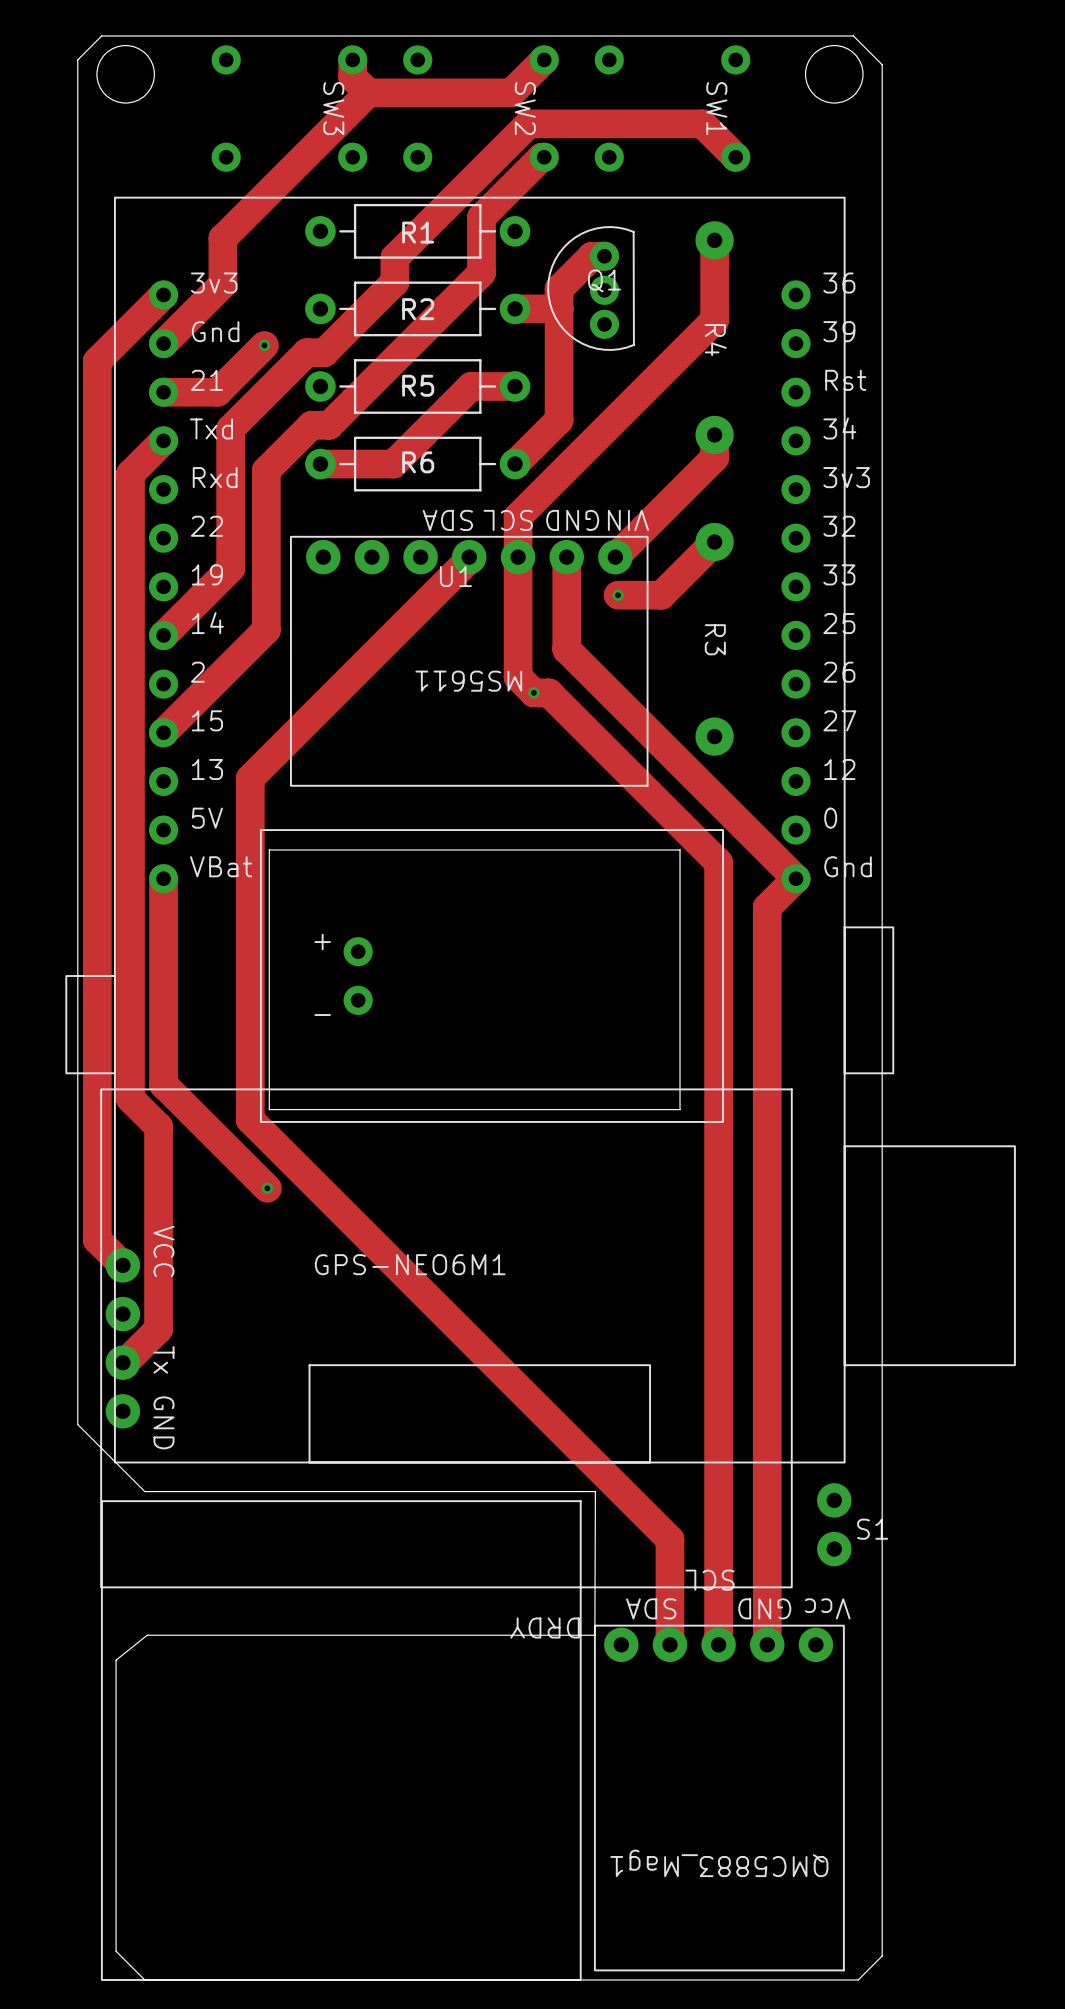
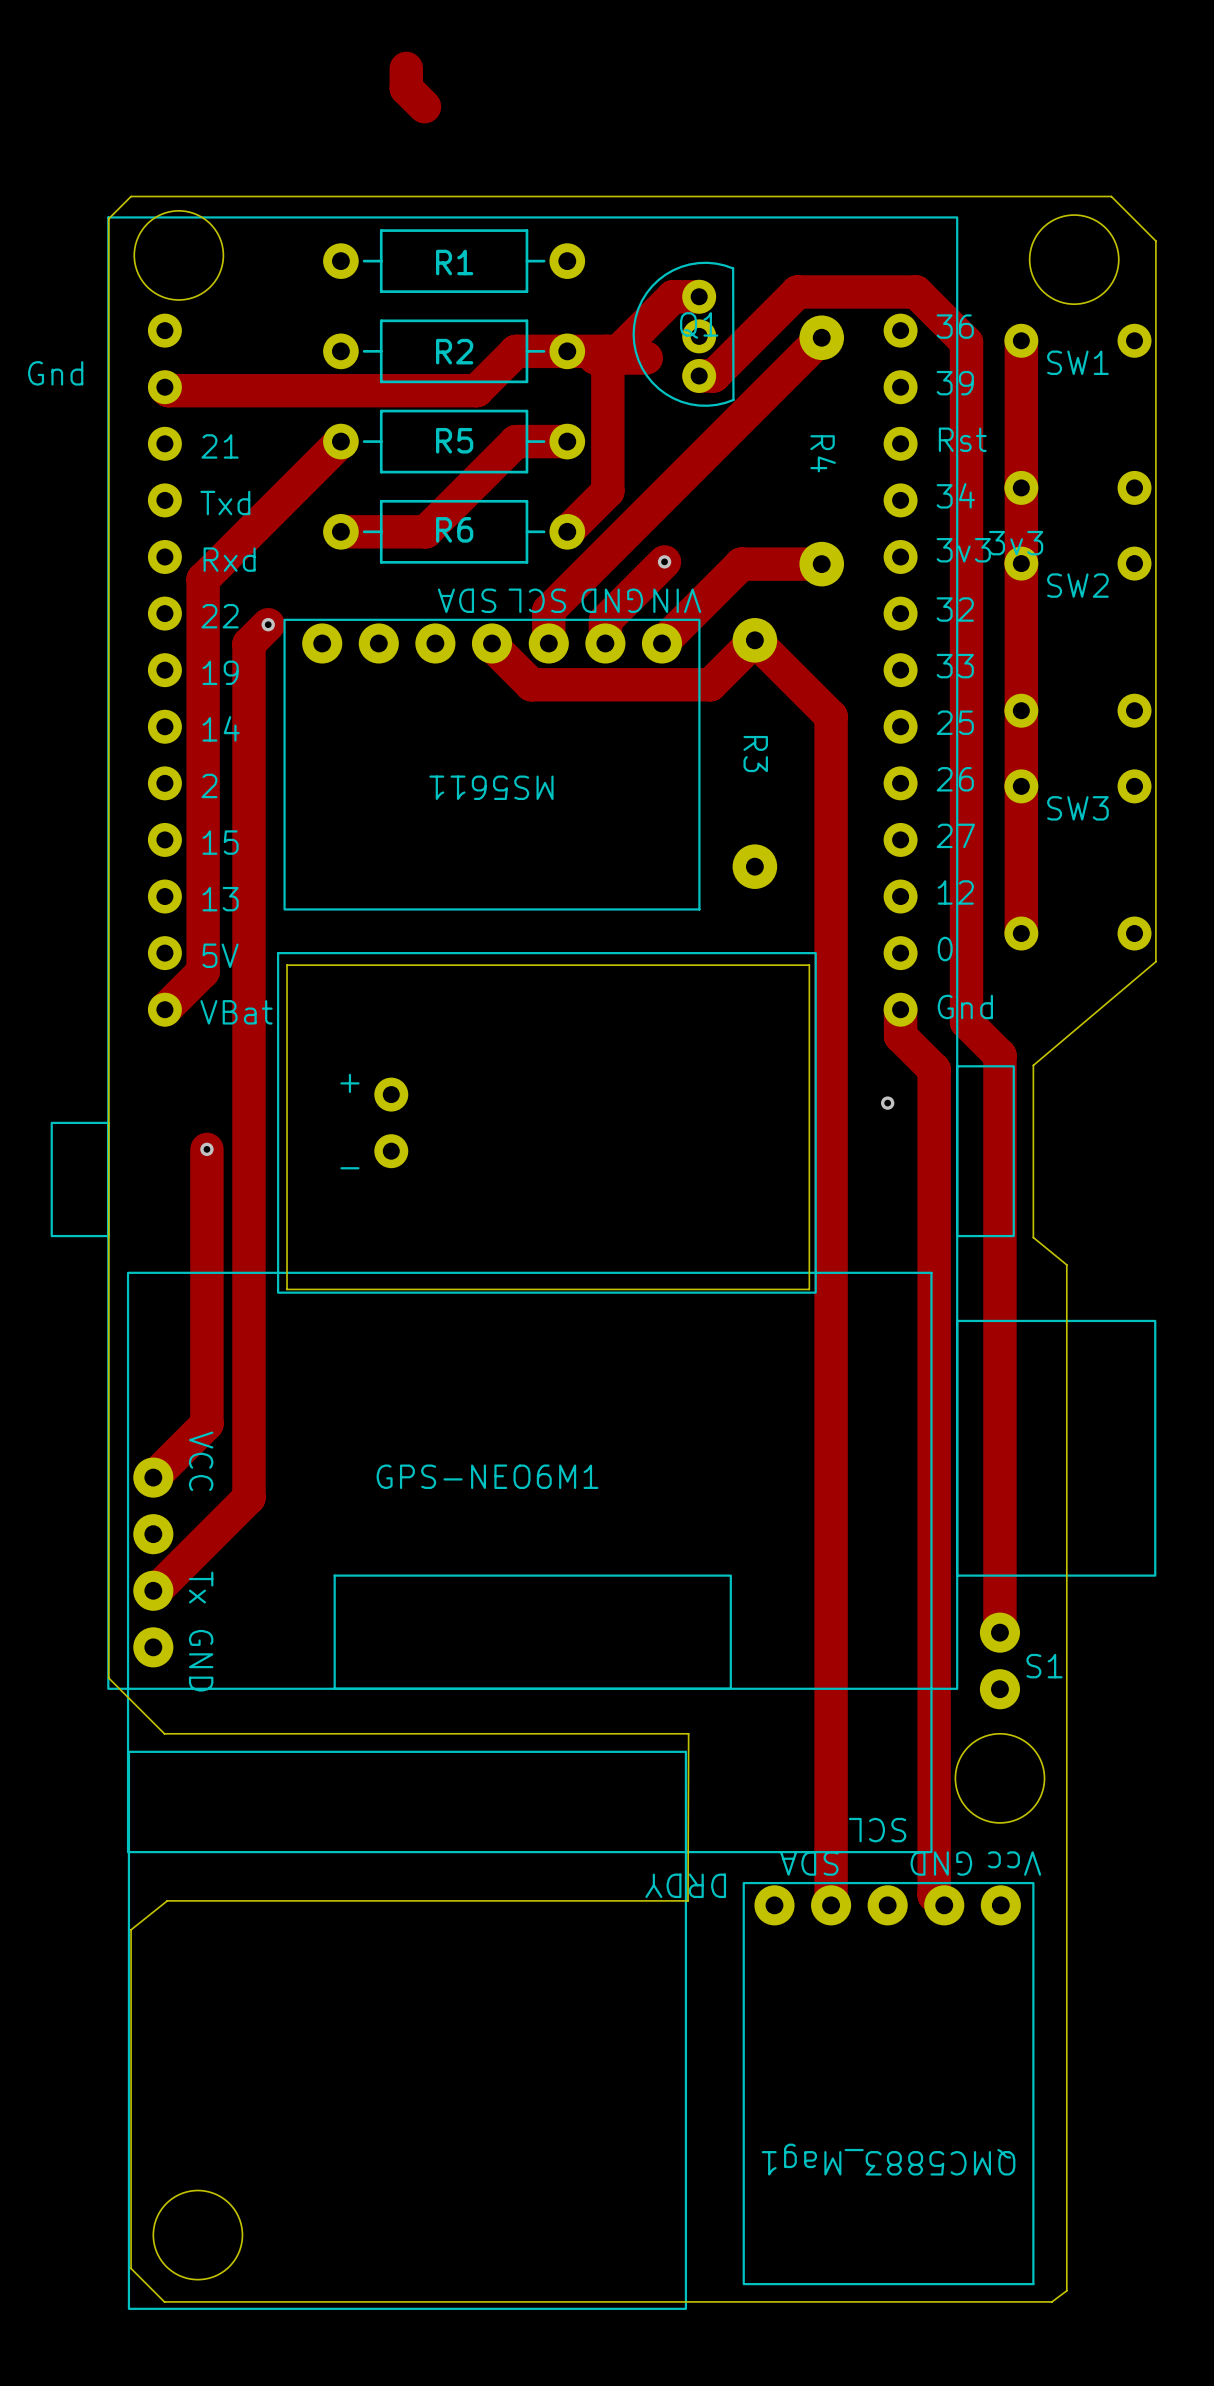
round board edge: [96, 45, 155, 104] -> none
round board edge: [805, 45, 864, 104] -> none
track: (544, 59) (511, 92) (368, 92) (222, 238) (222, 284) (163, 343) -> none
SW3 rotation: 0° (289, 108) -> 90° clockwise (1077, 859)
SW3 position: (289, 108) -> (1077, 859)
SW3 name position: SW3 (333, 108) -> SW3 (1077, 808)
SW2 rotation: 0° (480, 108) -> 90° clockwise (1077, 637)
SW2 position: (480, 108) -> (1077, 637)
SW2 name position: SW2 (525, 108) -> SW2 (1077, 585)
SW1 rotation: 0° (672, 108) -> 90° clockwise (1077, 414)
SW1 position: (672, 108) -> (1077, 414)
SW1 name position: SW1 (716, 108) -> SW1 (1077, 362)
track: (544, 157) (541, 157) (481, 217) (481, 273) (329, 425) (311, 425) (266, 470) (266, 630) (163, 732) -> none
track: (735, 157) (702, 123) (528, 123) (394, 257) (394, 282) (324, 352) (306, 352) (230, 428) (230, 568) (163, 635) -> none
round board edge: none -> [133, 210, 224, 301]
round board edge: none -> [1029, 214, 1120, 305]
R1 position: (417, 231) -> (454, 261)
track: (714, 240) (714, 320) (518, 516) (518, 677) (533, 692) (548, 692) (718, 862) (718, 1644) -> none
track: (591, 256) (559, 289) (559, 420) (515, 464) -> (684, 296) (673, 296) (618, 351) (516, 351) (476, 390) (168, 390) (164, 387)
track: none -> (821, 337) (548, 610) (548, 643)
track: (163, 294) (97, 361) (97, 1239) (122, 1265) -> none
track: none -> (1021, 340) (1021, 933)
track: none -> (606, 351) (607, 352) (607, 491) (567, 531)
R2 position: (417, 308) -> (454, 351)
track: none -> (699, 375) (713, 375) (797, 291) (916, 291) (966, 342) (966, 1022) (999, 1055) (999, 1632)
R4 position: (714, 337) -> (821, 450)
track: (264, 345) (217, 392) (163, 392) -> none
via: (264, 345) -> none
track: none -> (340, 441) (203, 579) (203, 971) (164, 1009)
R5 position: (417, 386) -> (454, 441)
track: (515, 386) (470, 386) (393, 464) (320, 464) -> (567, 441) (516, 441) (425, 531) (340, 531)
track: (714, 434) (714, 457) (615, 557) -> none
track: (163, 440) (130, 473) (130, 1098) (158, 1126) (158, 1329) (125, 1362) (122, 1362) -> none
R6 position: (417, 464) -> (454, 531)
track: none -> (664, 561) (605, 621) (605, 643)
via: none -> (664, 561)
track: none -> (821, 564) (741, 564) (661, 643)
track: none -> (268, 624) (248, 643) (248, 1497) (155, 1590) (153, 1590)
via: none -> (268, 624)
track: (714, 542) (661, 595) (618, 595) -> none
track: none -> (491, 643) (531, 684) (710, 684) (754, 640) (831, 716) (831, 1905)
track: (469, 557) (469, 559) (250, 778) (250, 1119) (669, 1539) (669, 1644) -> none
track: (566, 557) (566, 649) (795, 878) (767, 907) (767, 1644) -> none
via: (618, 595) -> none
R3 position: (714, 639) -> (754, 753)
MS5611 position: (469, 661) -> (491, 764)
via: (533, 692) -> none
part: none -> (603, 953)
U1: (540, 830) -> none
track: none -> (900, 1009) (900, 1036) (934, 1069) (934, 1895) (944, 1905)
track: (163, 878) (163, 1084) (267, 1188) -> none
via: none -> (887, 1103)
track: none -> (206, 1149) (206, 1423) (153, 1477)
via: none -> (206, 1149)
board edge: (269, 1109) (269, 849) (680, 849) (680, 1109) -> (309, 1289) (287, 1289) (287, 965) (809, 965) (809, 1289) (787, 1289)
via: (267, 1188) -> none
board edge: (96, 1443) (77, 1424) (77, 59) (101, 36) (853, 36) (882, 64) (882, 1956) (858, 1979) -> (108, 1678) (108, 218) (131, 196) (1111, 196) (1155, 241) (1155, 961) (1033, 1065) (1033, 1237) (1066, 1264) (1066, 2290) (1051, 2301) (994, 2301)
round board edge: none -> [954, 1733, 1046, 1824]
S1 position: (834, 1524) -> (999, 1660)
GPS-NEO6M1 position: (446, 1534) -> (529, 1790)
QMC5883_Mag1 position: (719, 1798) -> (888, 2083)
round board edge: none -> [152, 2189, 244, 2281]

